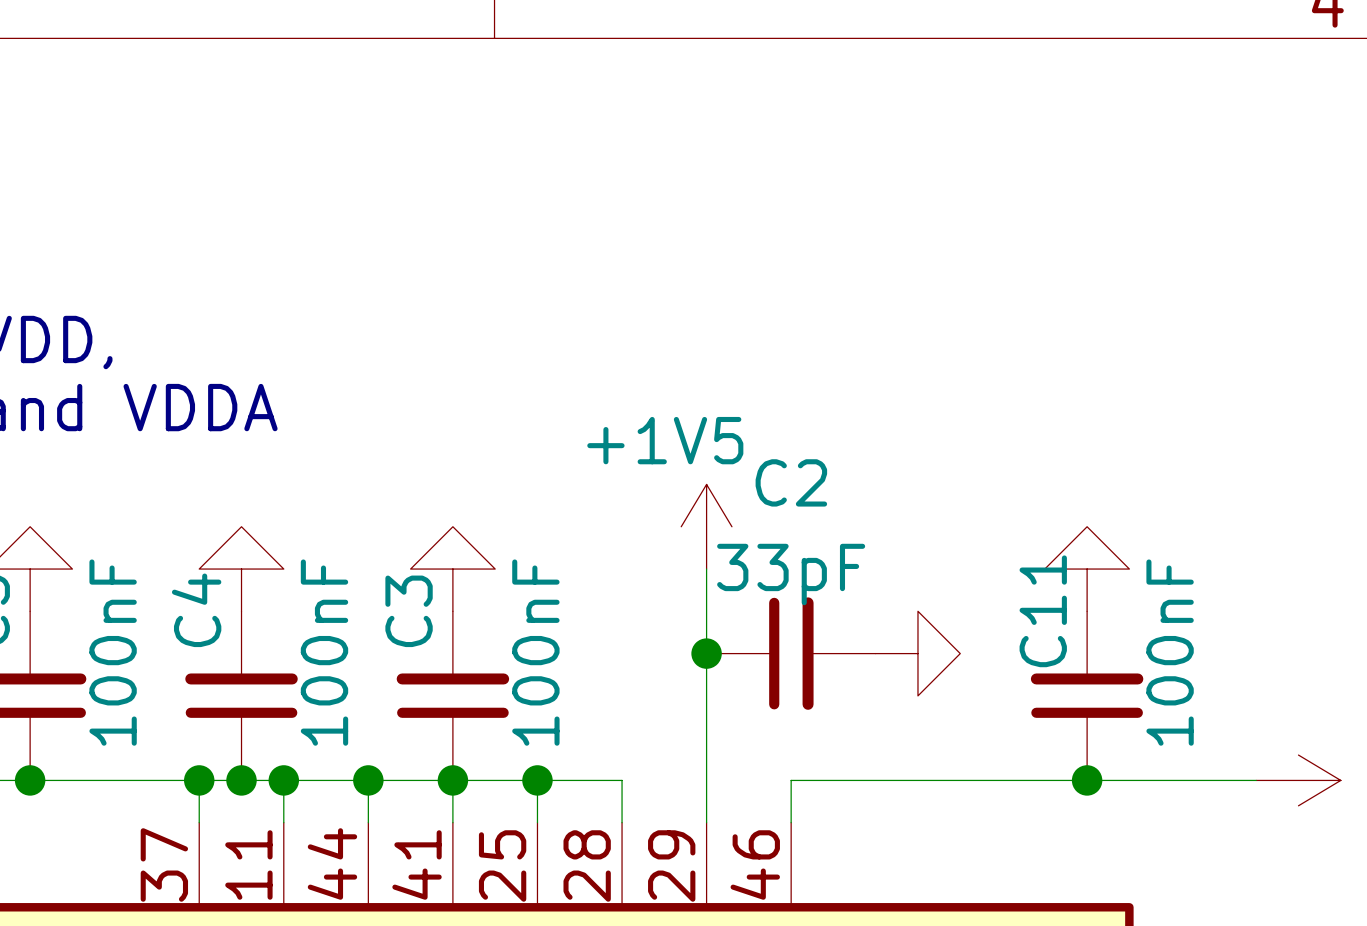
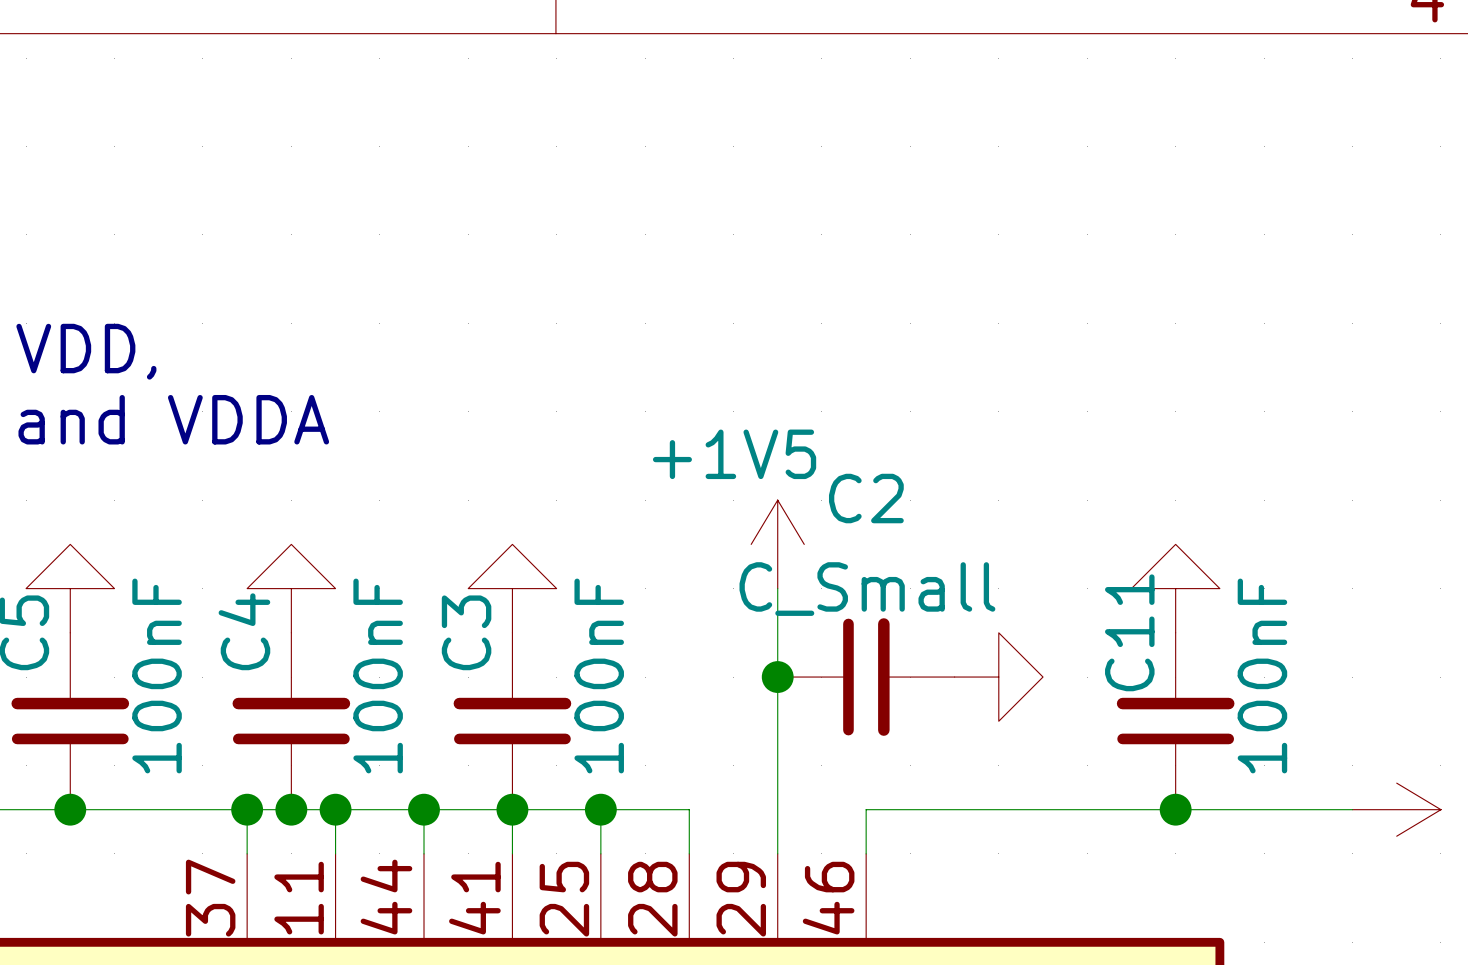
C2 value: 33pF (791, 574) -> C_Small (867, 589)

